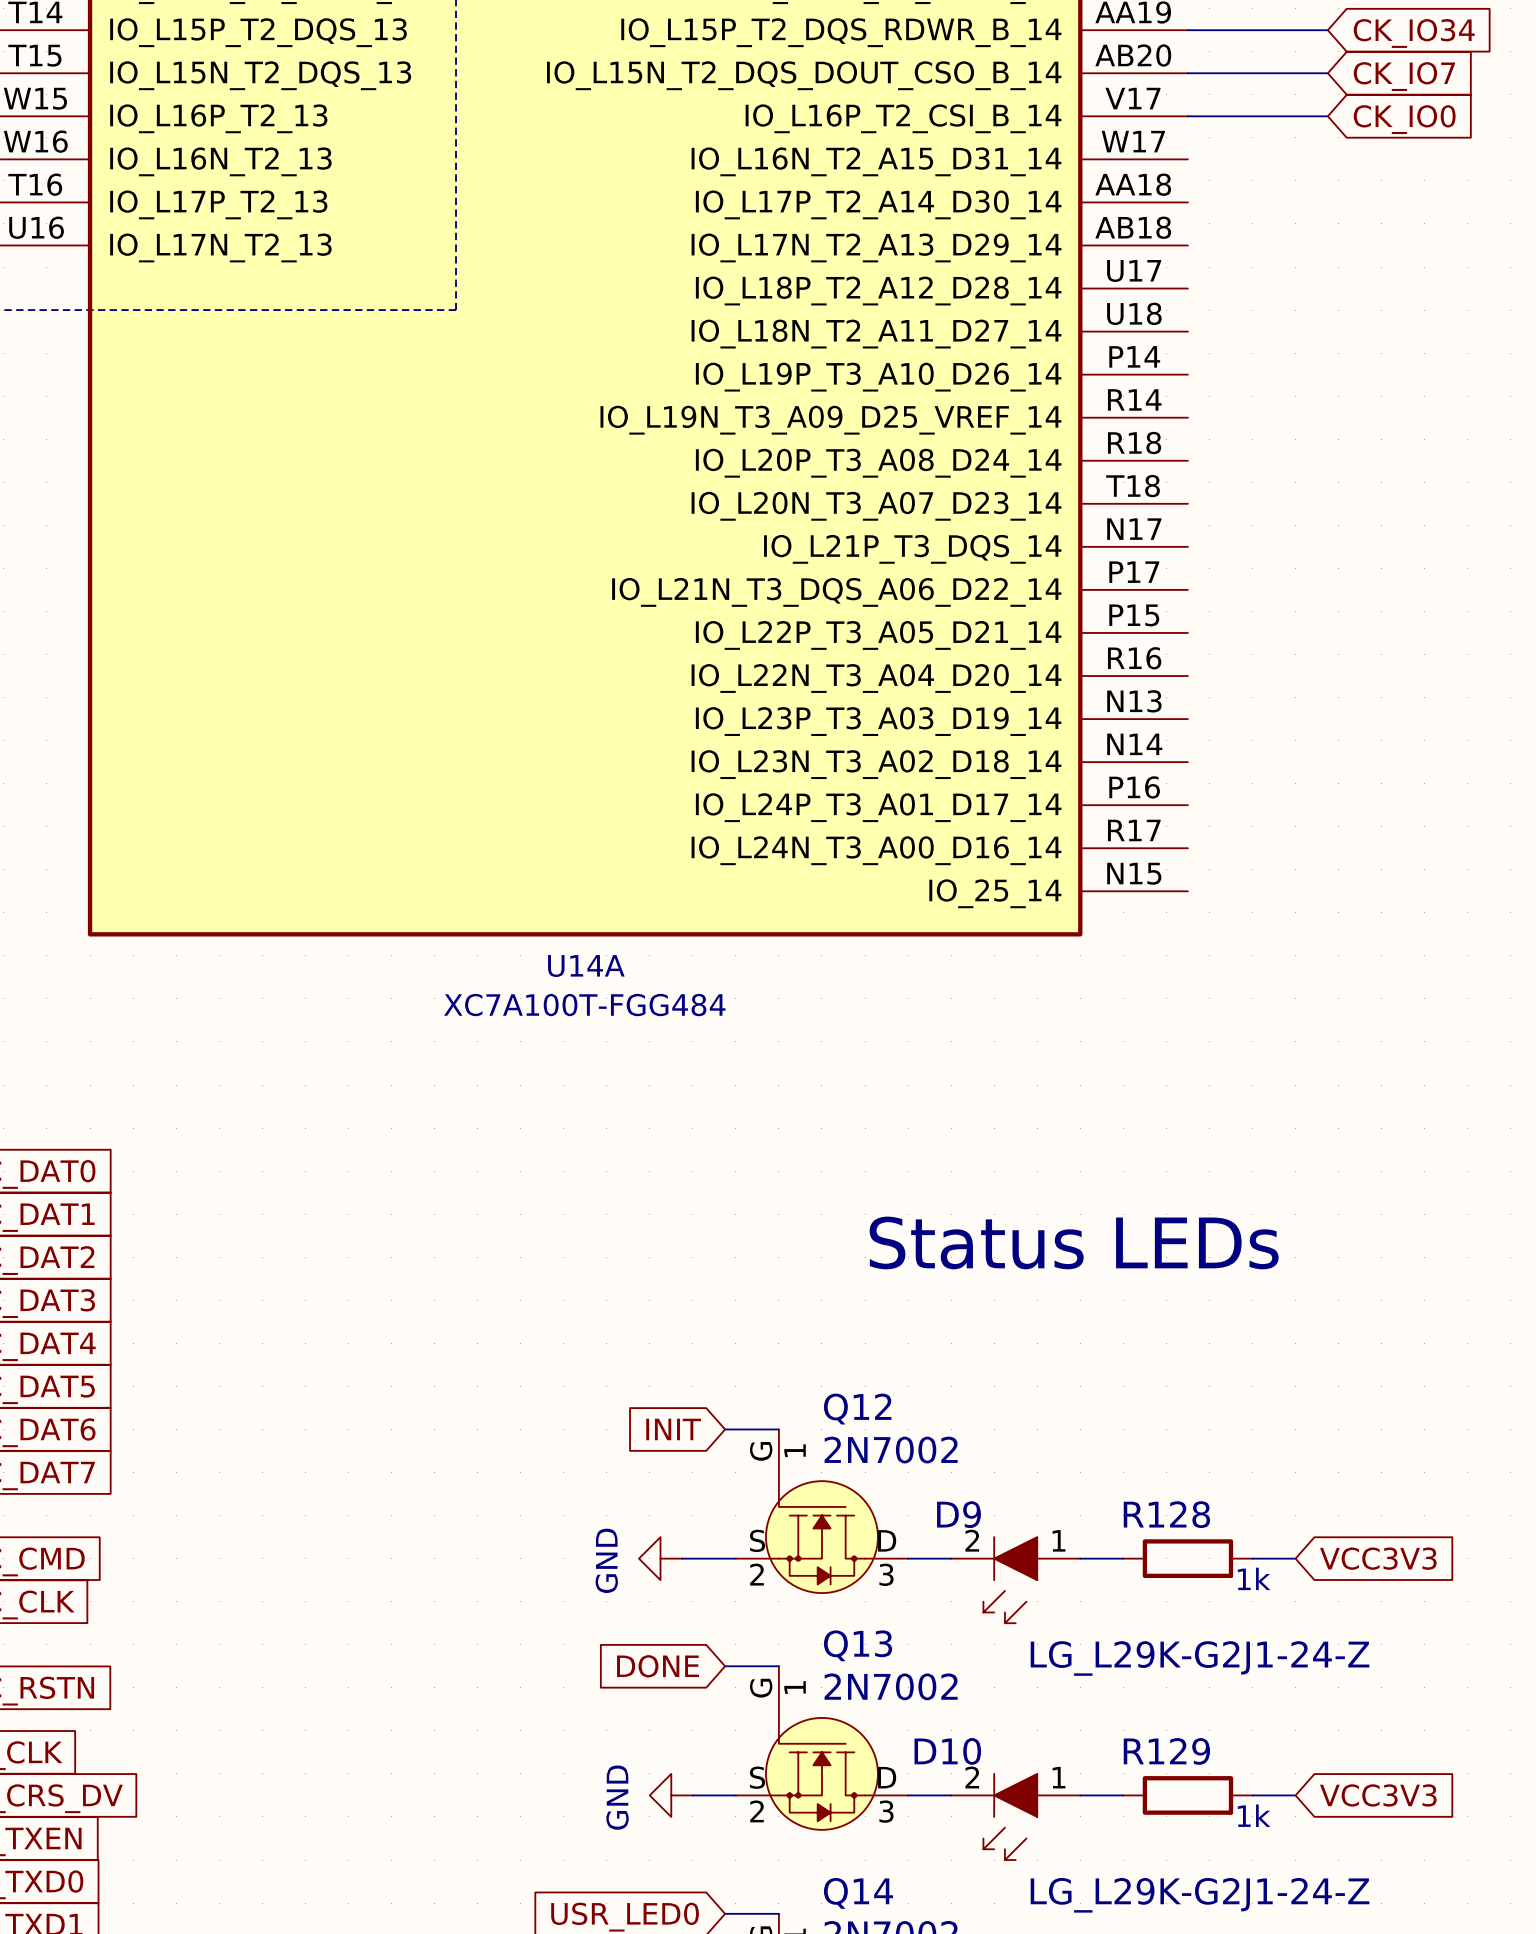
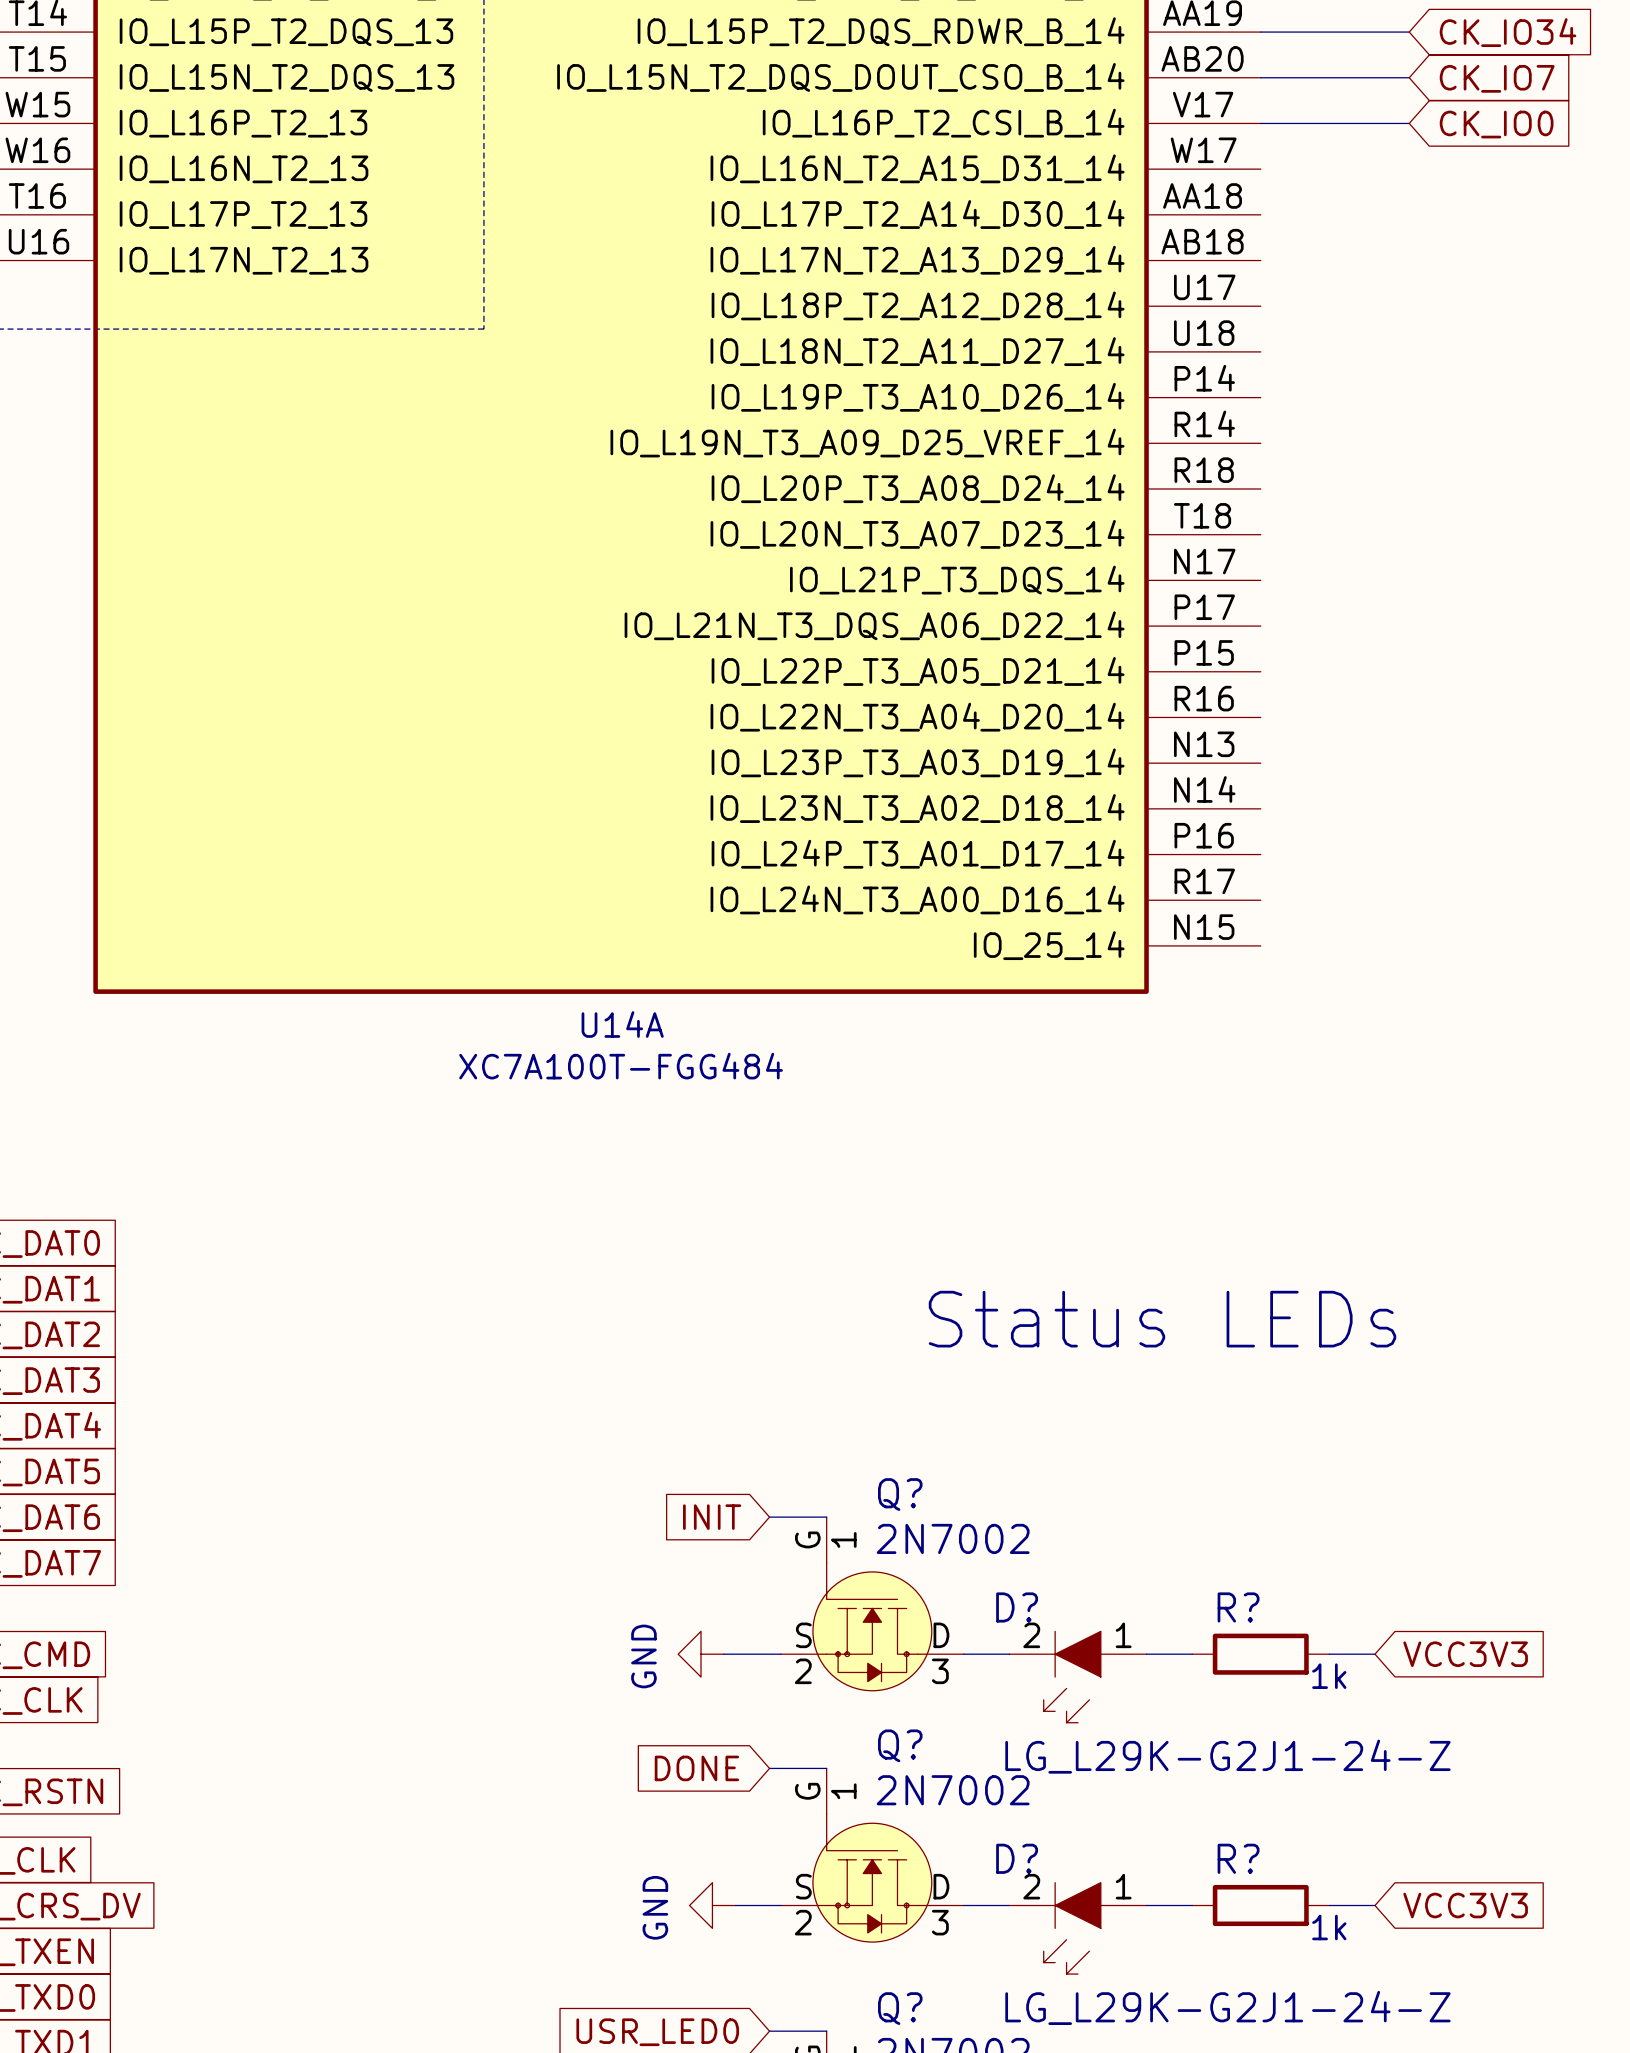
Q12 name: Q12 (857, 1409) -> Q? (900, 1494)
D9 name: D9 (959, 1514) -> D? (1017, 1607)
R128 name: R128 (1166, 1514) -> R? (1238, 1607)
Q13 name: Q13 (858, 1645) -> Q? (900, 1745)
D10 name: D10 (947, 1751) -> D? (1017, 1858)
R129 name: R129 (1166, 1751) -> R? (1238, 1858)
Q14 name: Q14 (858, 1893) -> Q? (900, 2008)

